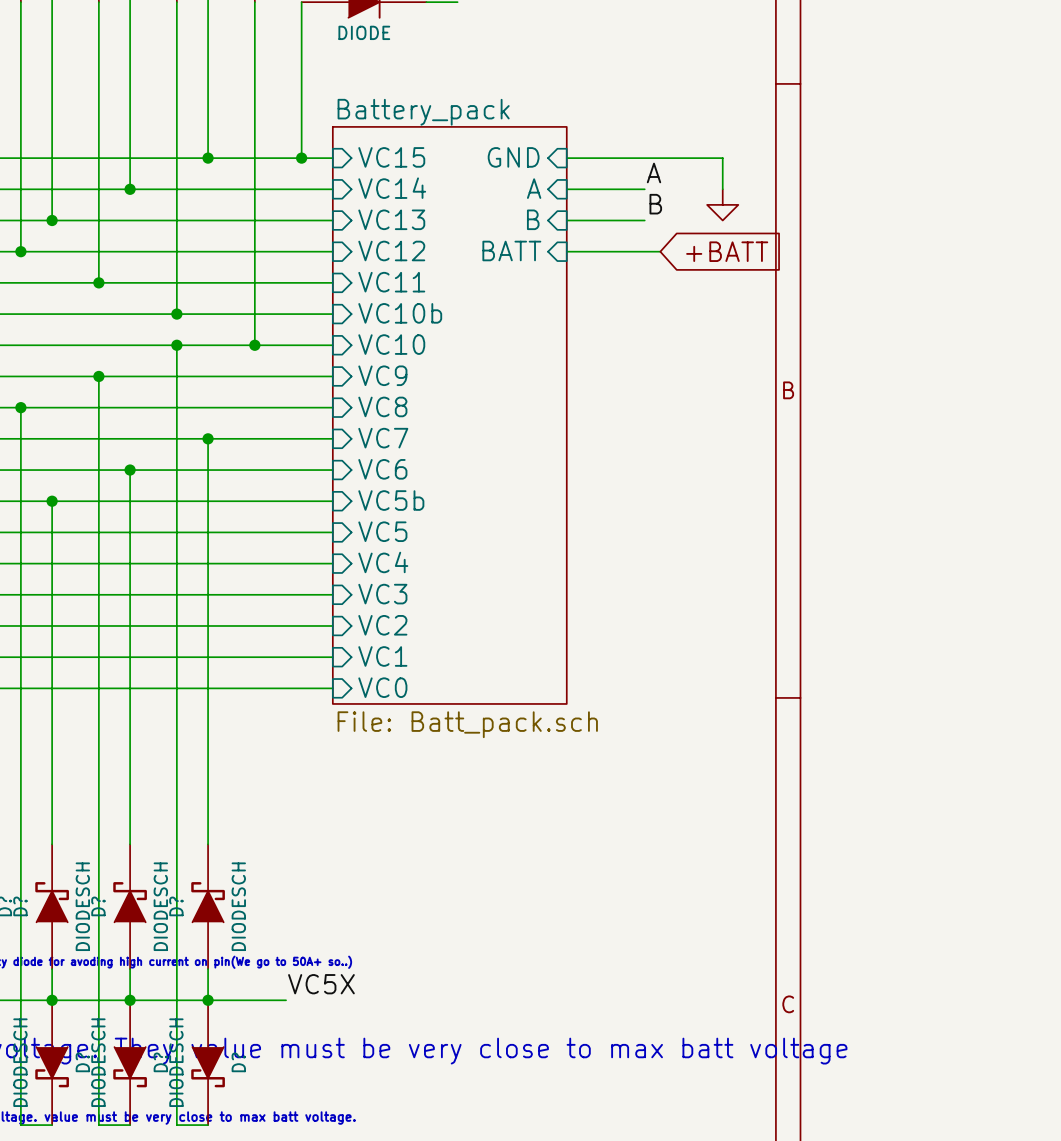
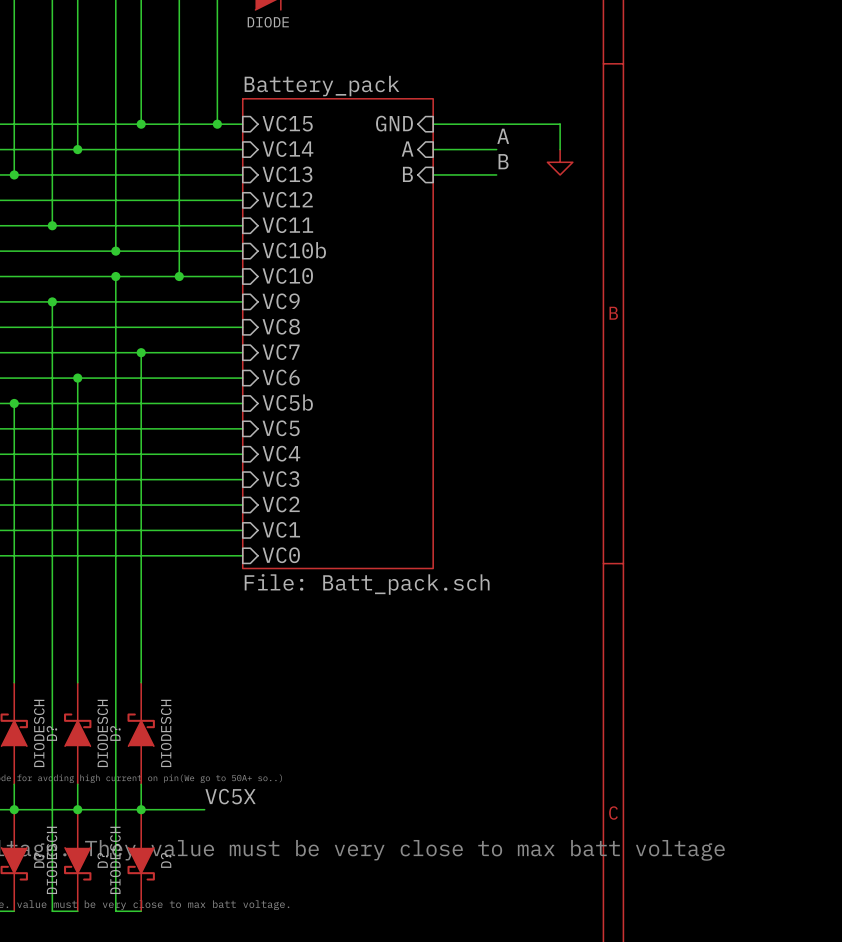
sheet pin: BATT (511, 250) -> none
wire: (566, 251) (660, 251) -> none
global label: +BATT (727, 251) -> none

